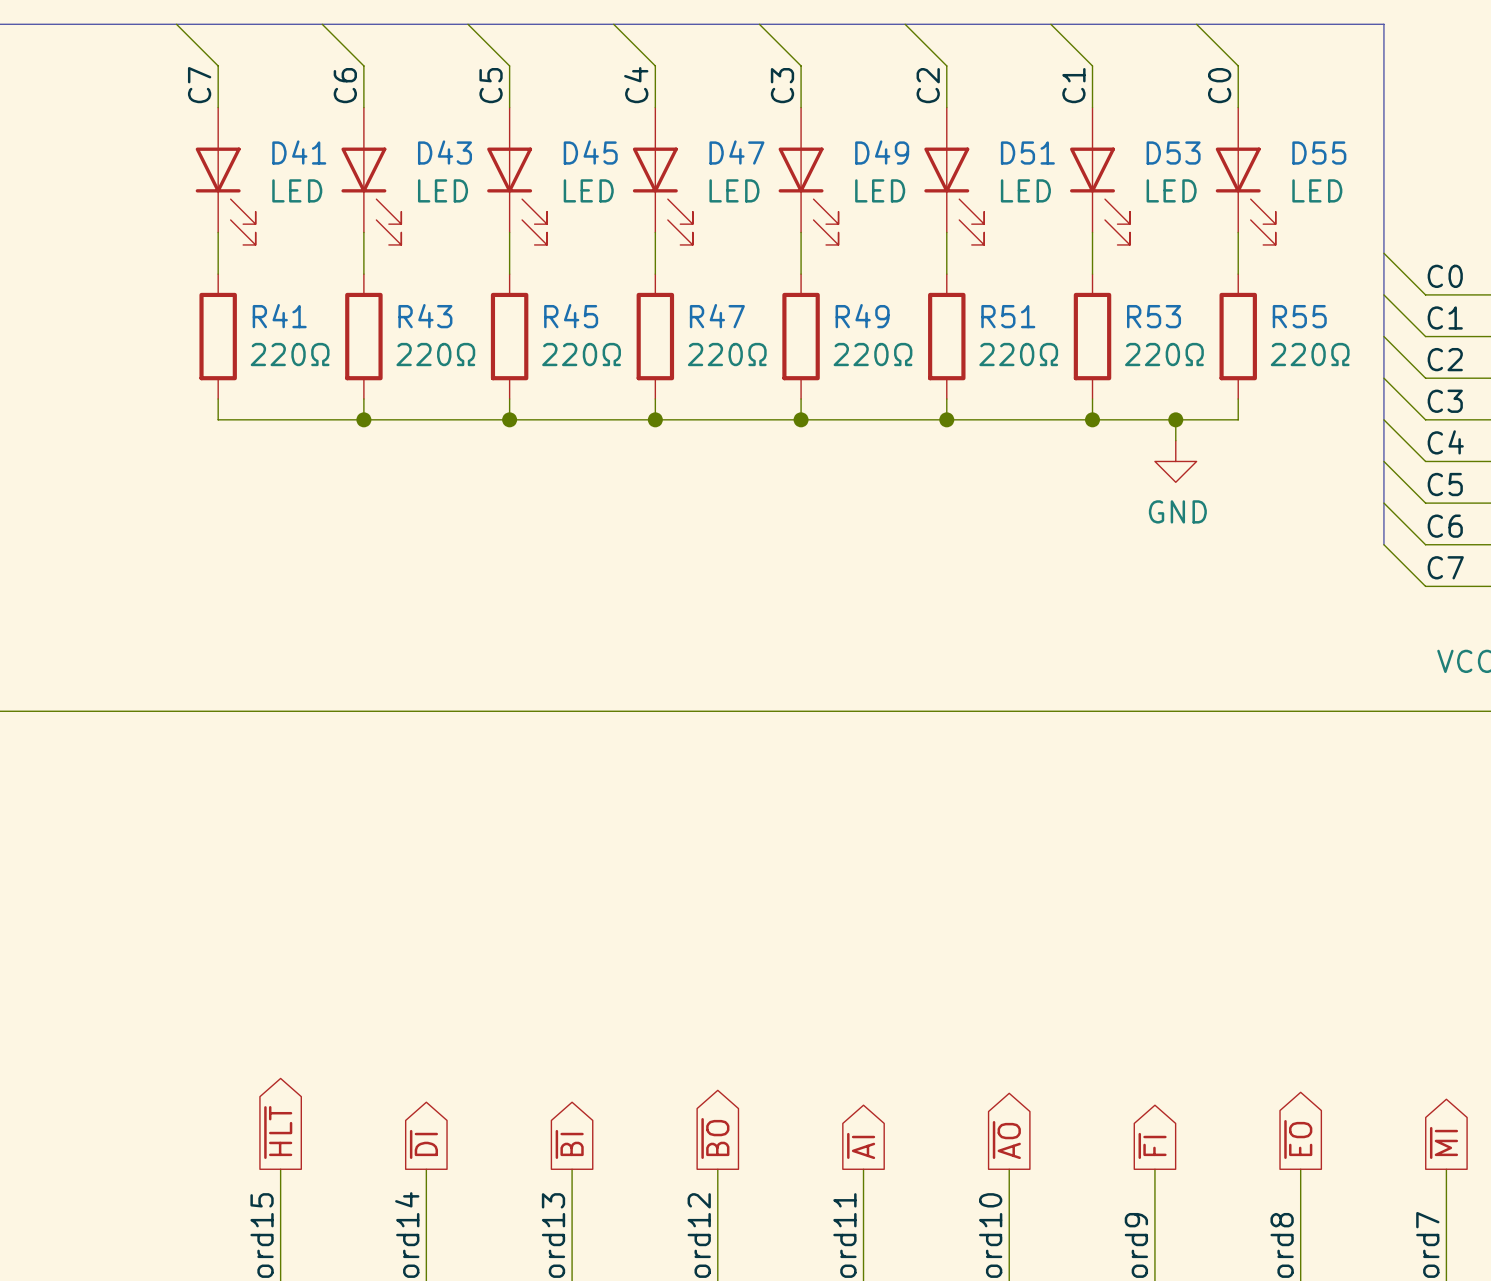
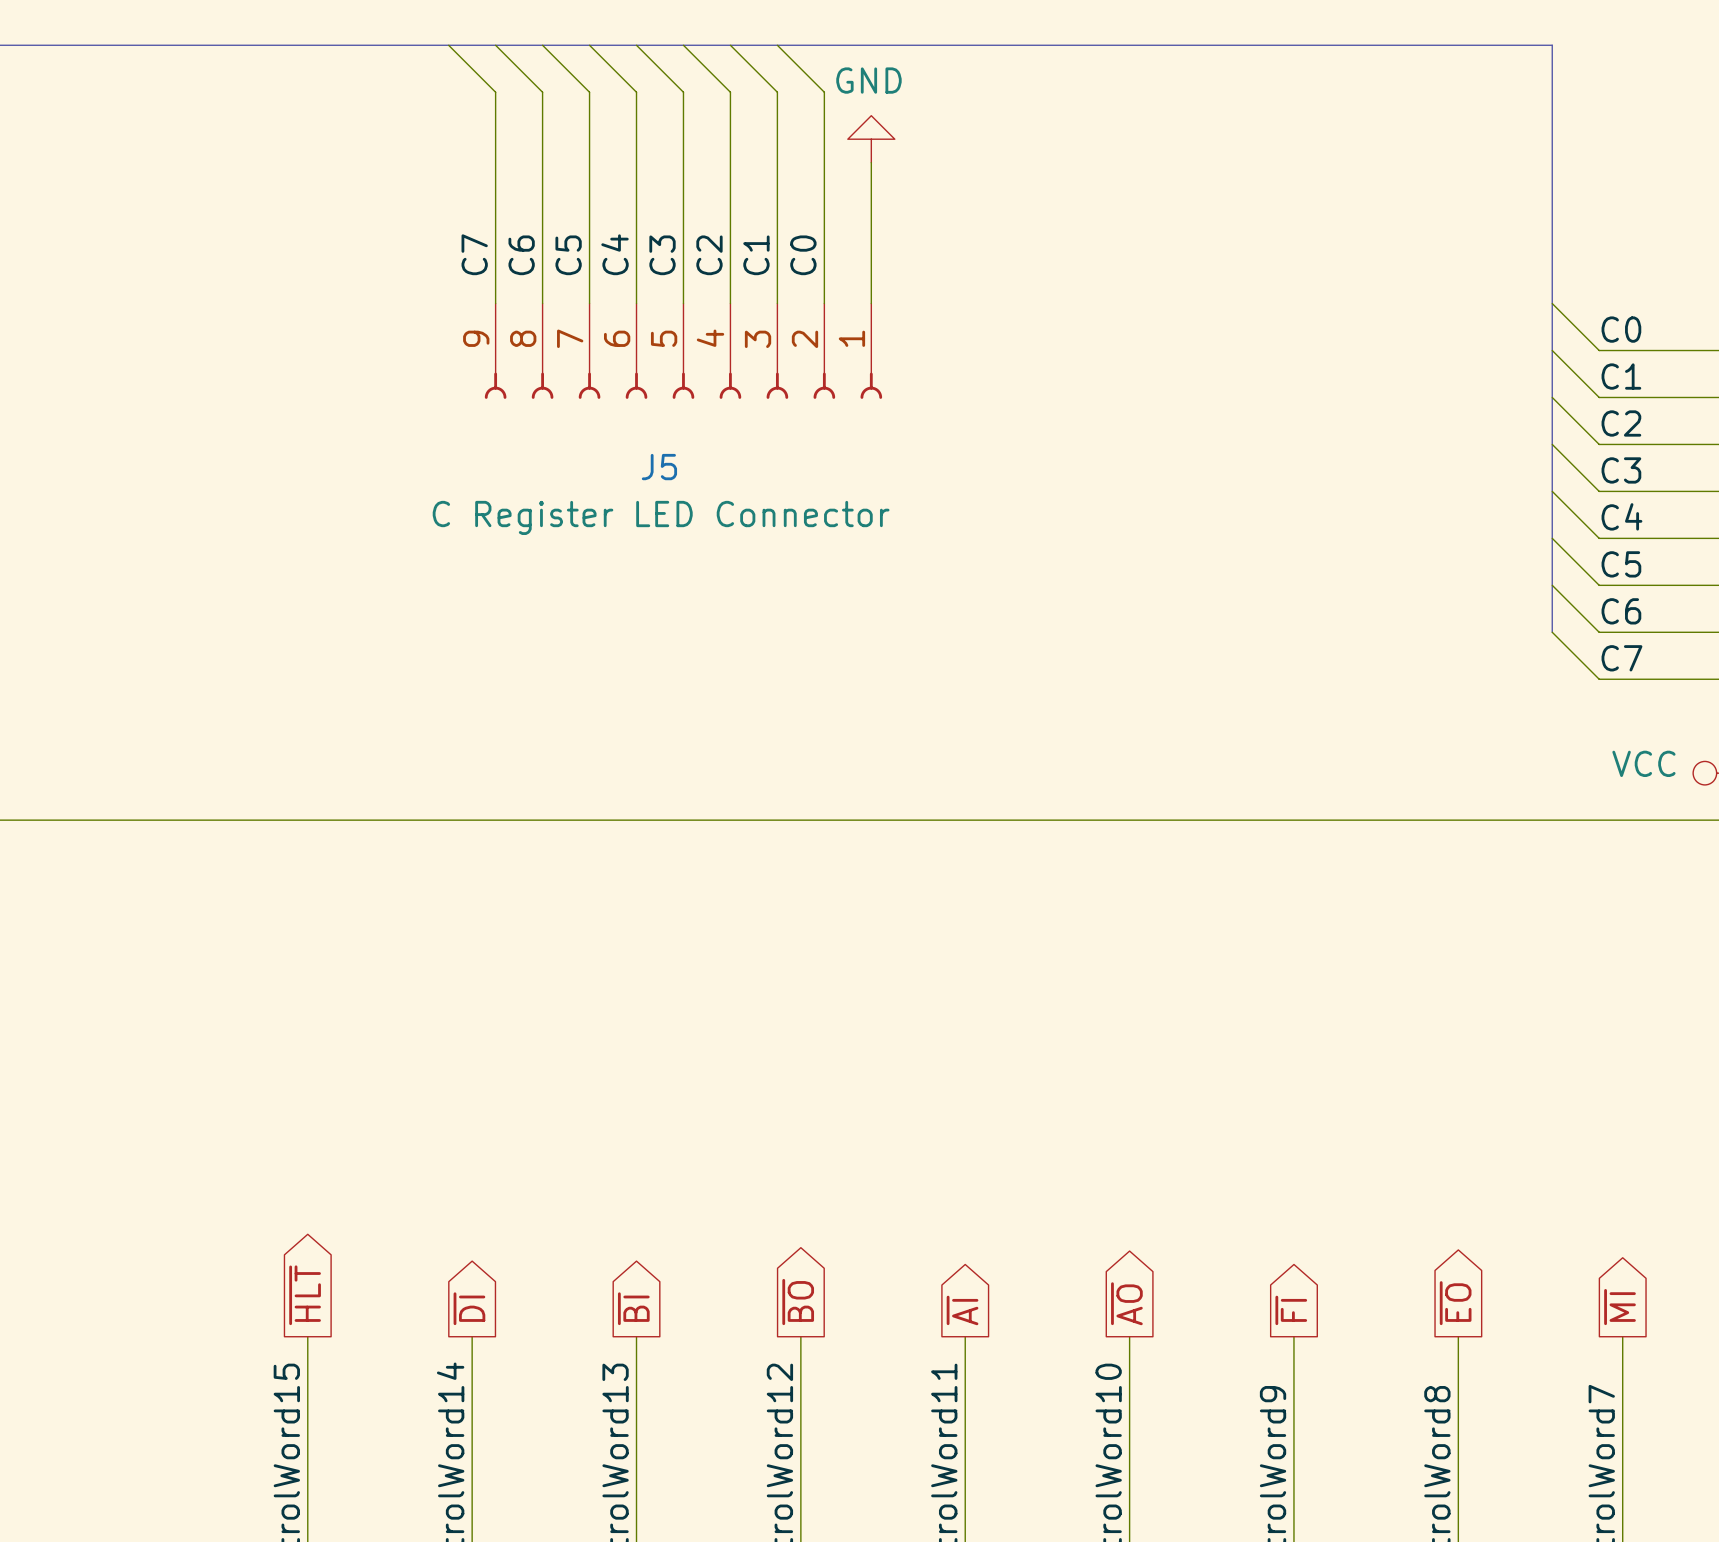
wire: (176, 24) (218, 65) (218, 107) -> none
wire: (322, 24) (363, 65) (363, 107) -> none
wire: none -> (448, 45) (495, 92) (495, 303)
wire: none -> (495, 45) (542, 92) (542, 303)
wire: (467, 24) (509, 65) (509, 107) -> none
wire: none -> (542, 45) (589, 92) (589, 303)
wire: none -> (589, 45) (636, 92) (636, 303)
wire: none -> (636, 45) (683, 92) (683, 303)
wire: none -> (730, 45) (777, 92) (777, 303)
wire: none -> (777, 45) (824, 92) (824, 303)
wire: (759, 24) (801, 65) (801, 107) -> none
wire: (905, 24) (946, 65) (946, 107) -> none
wire: (1050, 24) (1092, 65) (1092, 107) -> none
wire: (1196, 24) (1238, 65) (1238, 107) -> none
label position: C7 (199, 85) -> C7 (474, 254)
label position: C6 (345, 85) -> C6 (521, 255)
label position: C5 (491, 85) -> C5 (568, 255)
label position: C4 (636, 85) -> C4 (614, 254)
label position: C3 (782, 85) -> C3 (662, 255)
label position: C2 (928, 85) -> C2 (709, 255)
label: C1 (1073, 85) -> none
label: C0 (1219, 85) -> none
power symbol: none -> GND (871, 139)
wire: none -> (871, 162) (871, 303)
D41: LED (225, 176) -> none
D43: LED (371, 176) -> none
D45: LED (517, 176) -> none
D47: LED (662, 176) -> none
D49: LED (808, 176) -> none
D51: LED (954, 176) -> none
D53: LED (1100, 176) -> none
D55: LED (1245, 176) -> none
label: none -> C1 (756, 255)
label: none -> C0 (803, 255)
wire: (218, 232) (218, 274) -> none
wire: (363, 232) (363, 274) -> none
wire: (509, 232) (509, 274) -> none
wire: (801, 232) (801, 274) -> none
wire: (946, 232) (946, 274) -> none
wire: (1092, 232) (1092, 274) -> none
wire: (1238, 232) (1238, 274) -> none
J5: none -> C Register LED Connector (683, 351)
R41: 220Ω (218, 336) -> none
R43: 220Ω (363, 336) -> none
R45: 220Ω (509, 336) -> none
R47: 220Ω (655, 336) -> none
R49: 220Ω (801, 336) -> none
R51: 220Ω (946, 336) -> none
R53: 220Ω (1092, 336) -> none
R55: 220Ω (1238, 336) -> none
wire: (218, 399) (218, 419) (1238, 419) (1238, 399) -> none
wire: (363, 399) (363, 419) -> none
wire: (509, 399) (509, 419) -> none
wire: (655, 399) (655, 419) -> none
wire: (801, 399) (801, 419) -> none
wire: (946, 399) (946, 419) -> none
wire: (1092, 399) (1092, 419) -> none
junction: (363, 419) -> none
junction: (509, 419) -> none
junction: (655, 419) -> none
junction: (801, 419) -> none
junction: (946, 419) -> none
junction: (1092, 419) -> none
wire: (1175, 419) (1175, 440) -> none
junction: (1175, 419) -> none
power symbol: GND (1175, 461) -> none

